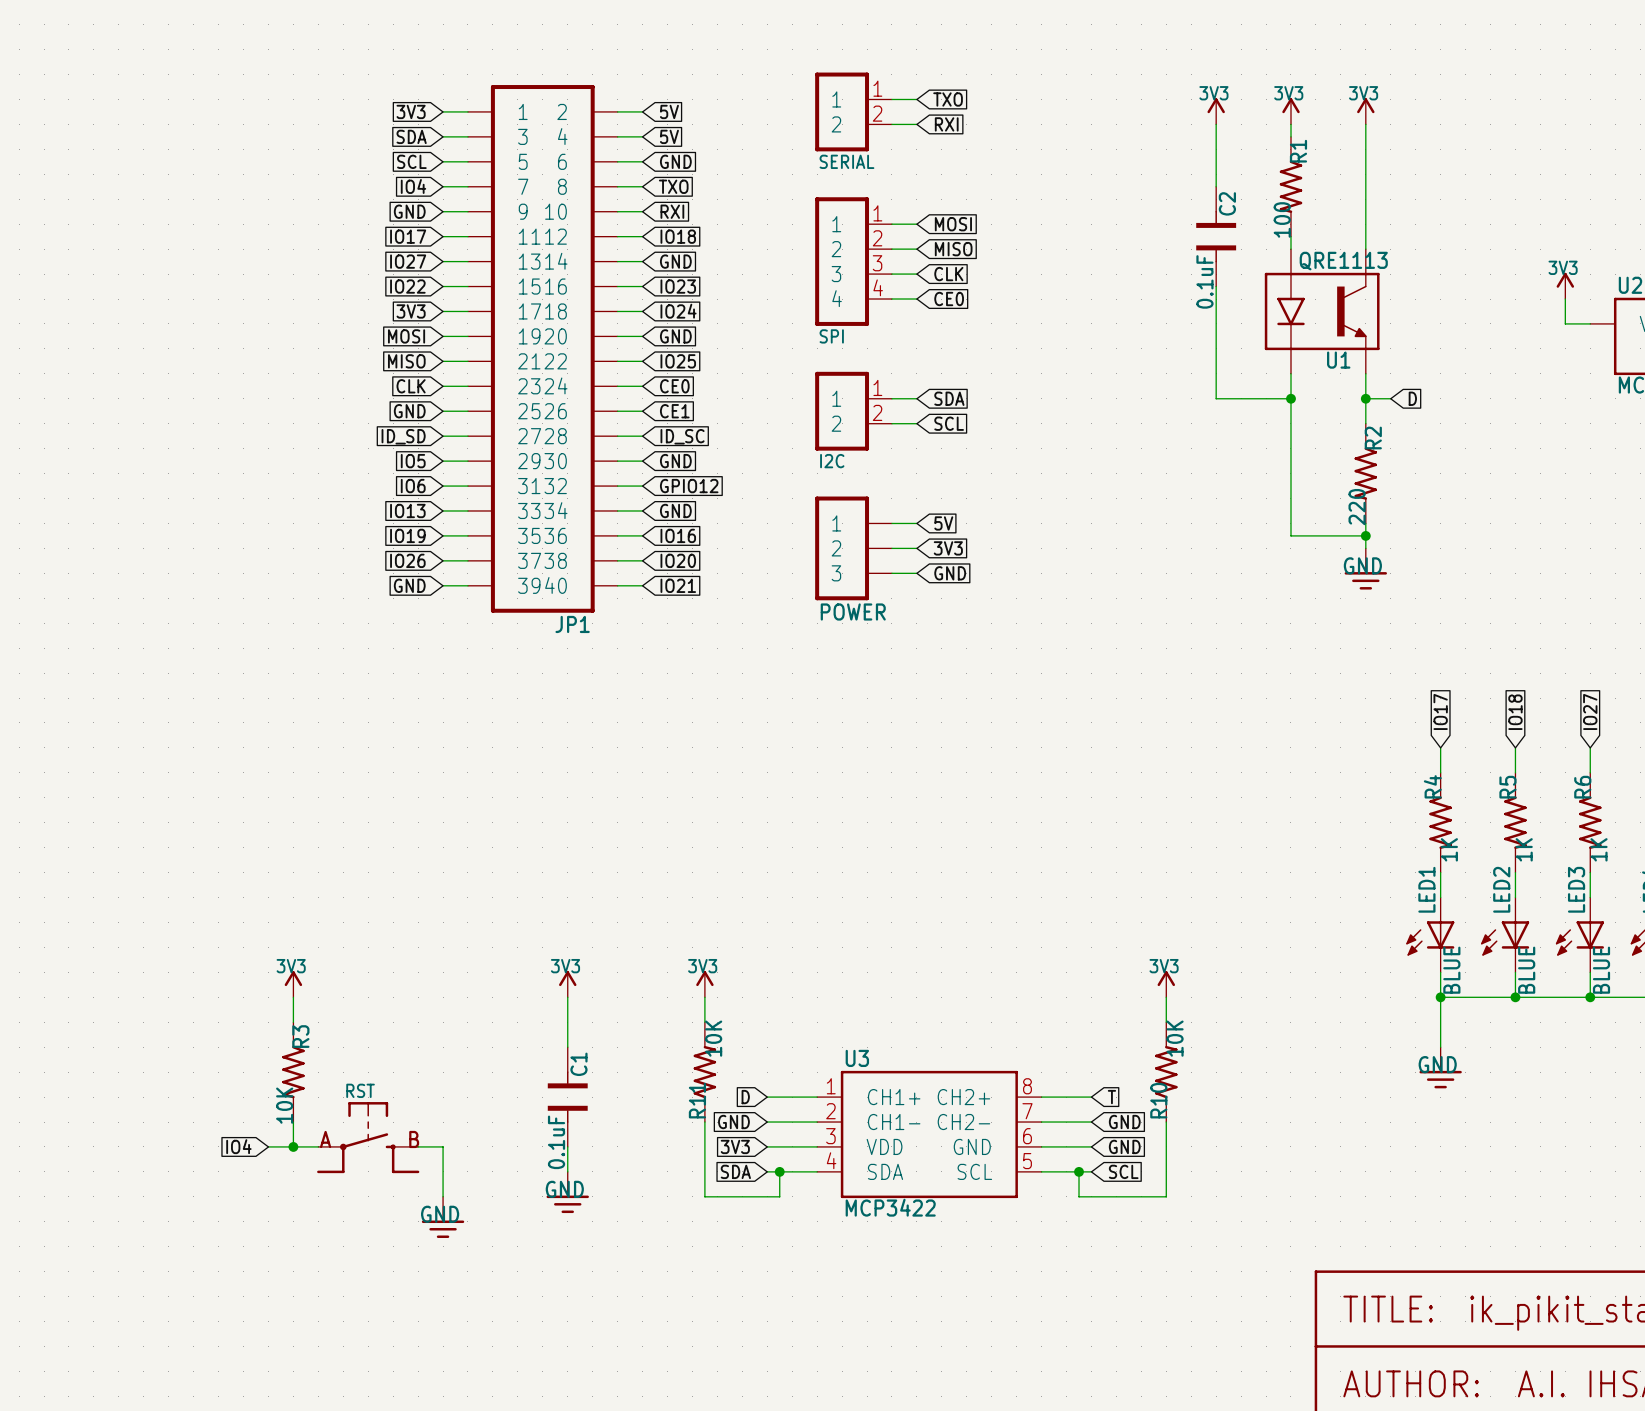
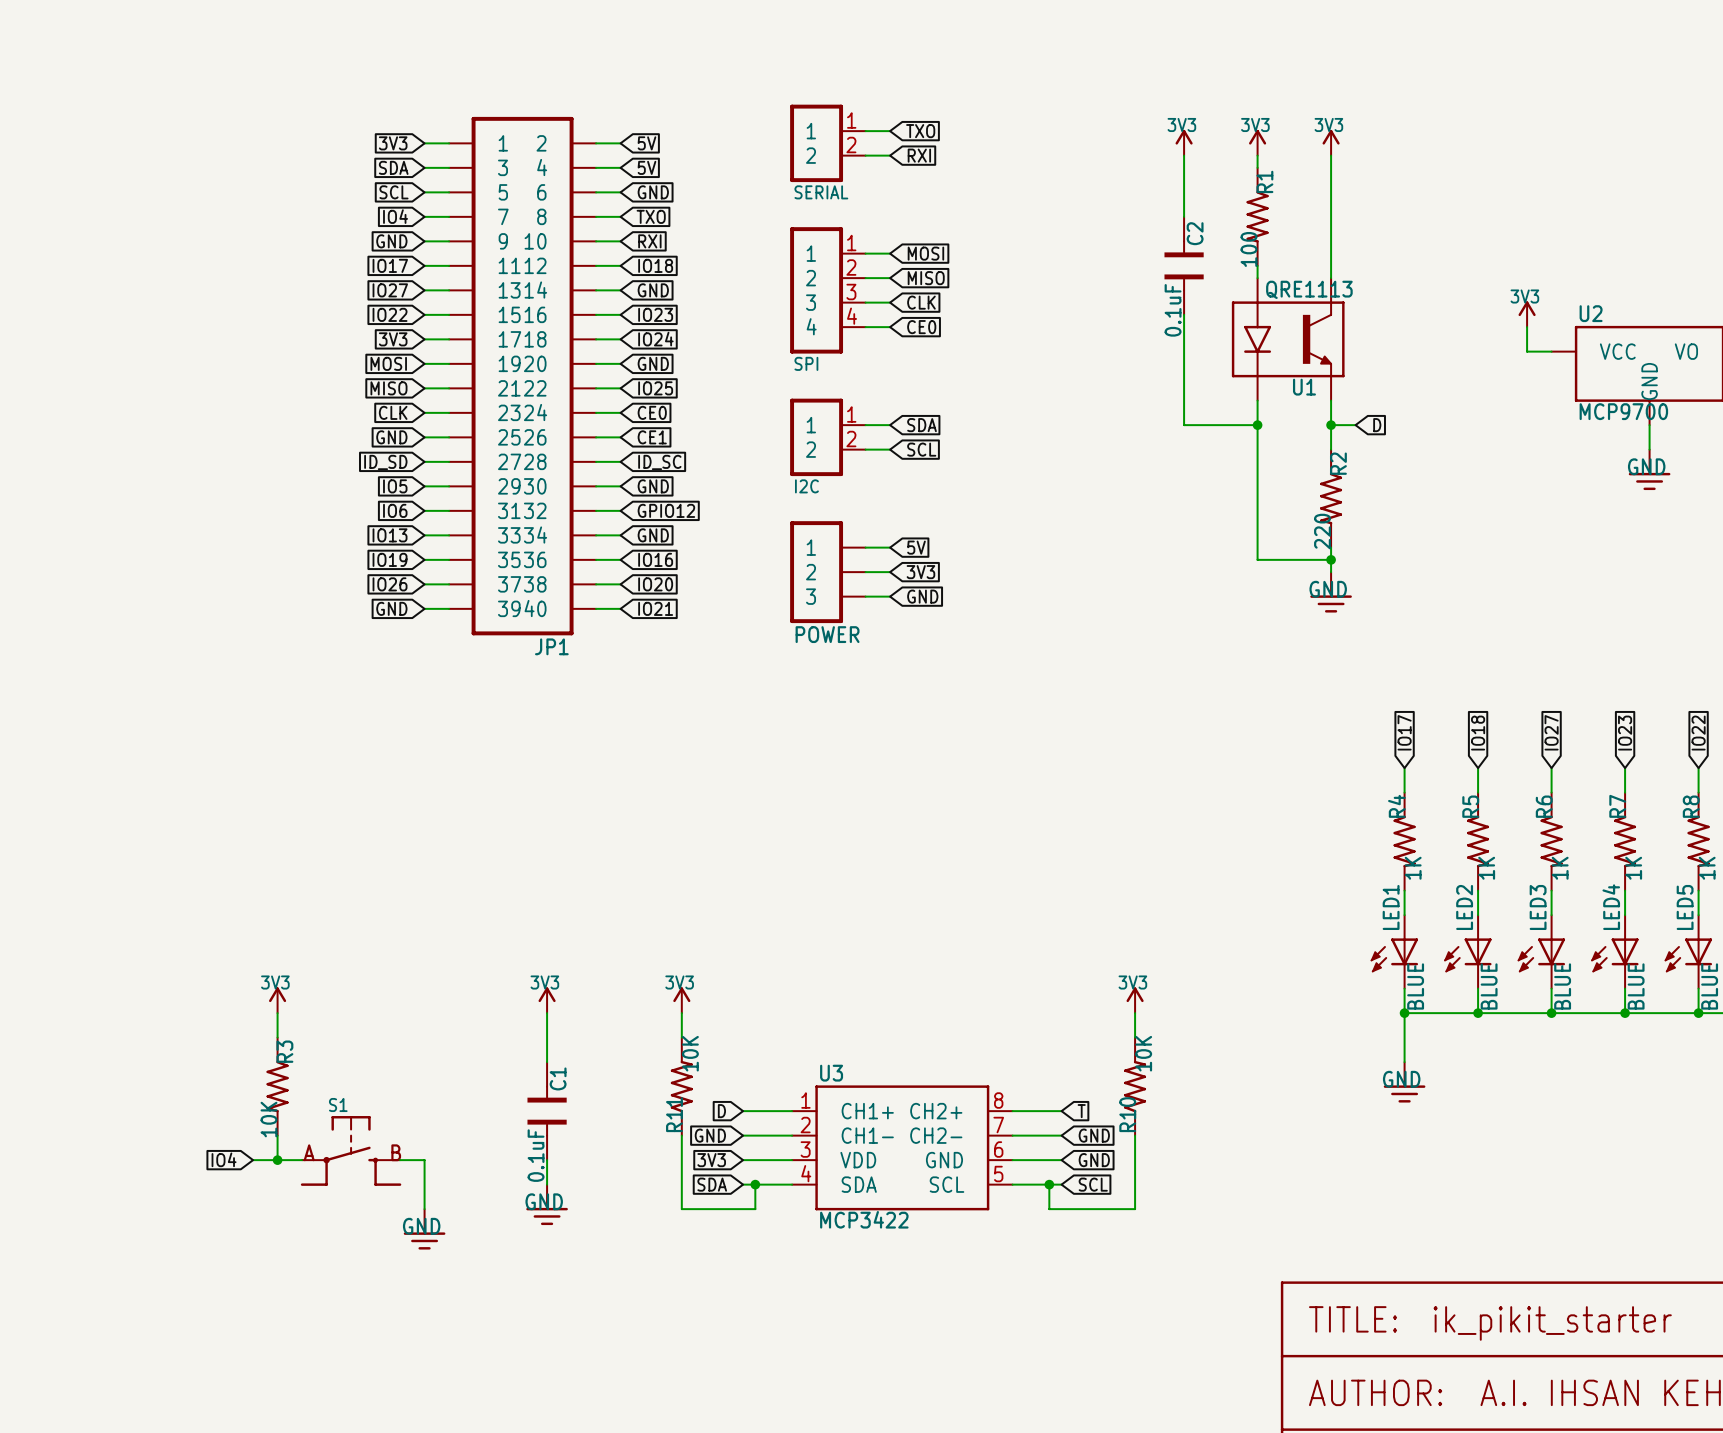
RST name: RST (360, 1090) -> S1 (338, 1105)

